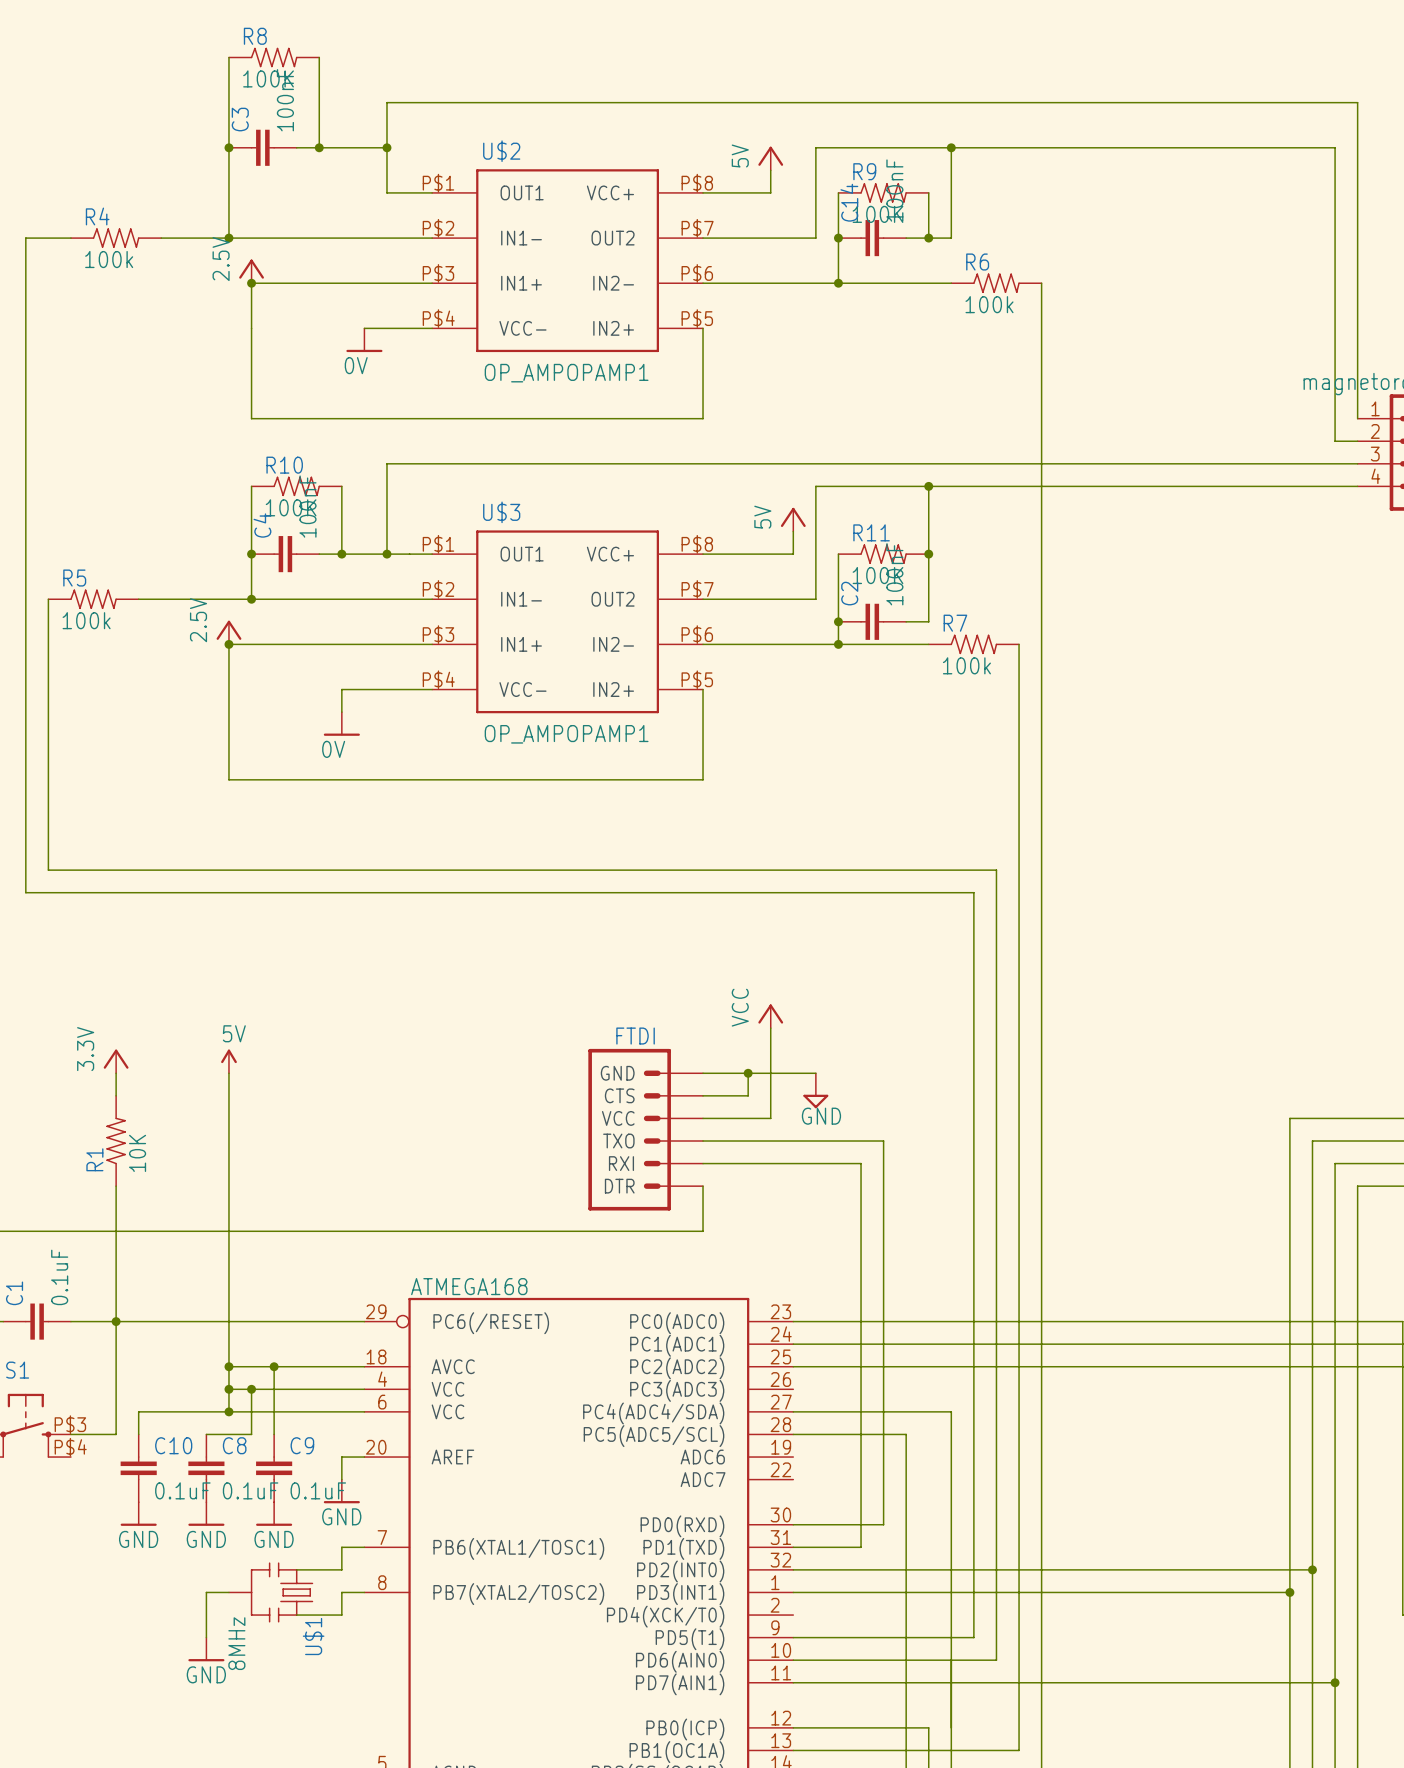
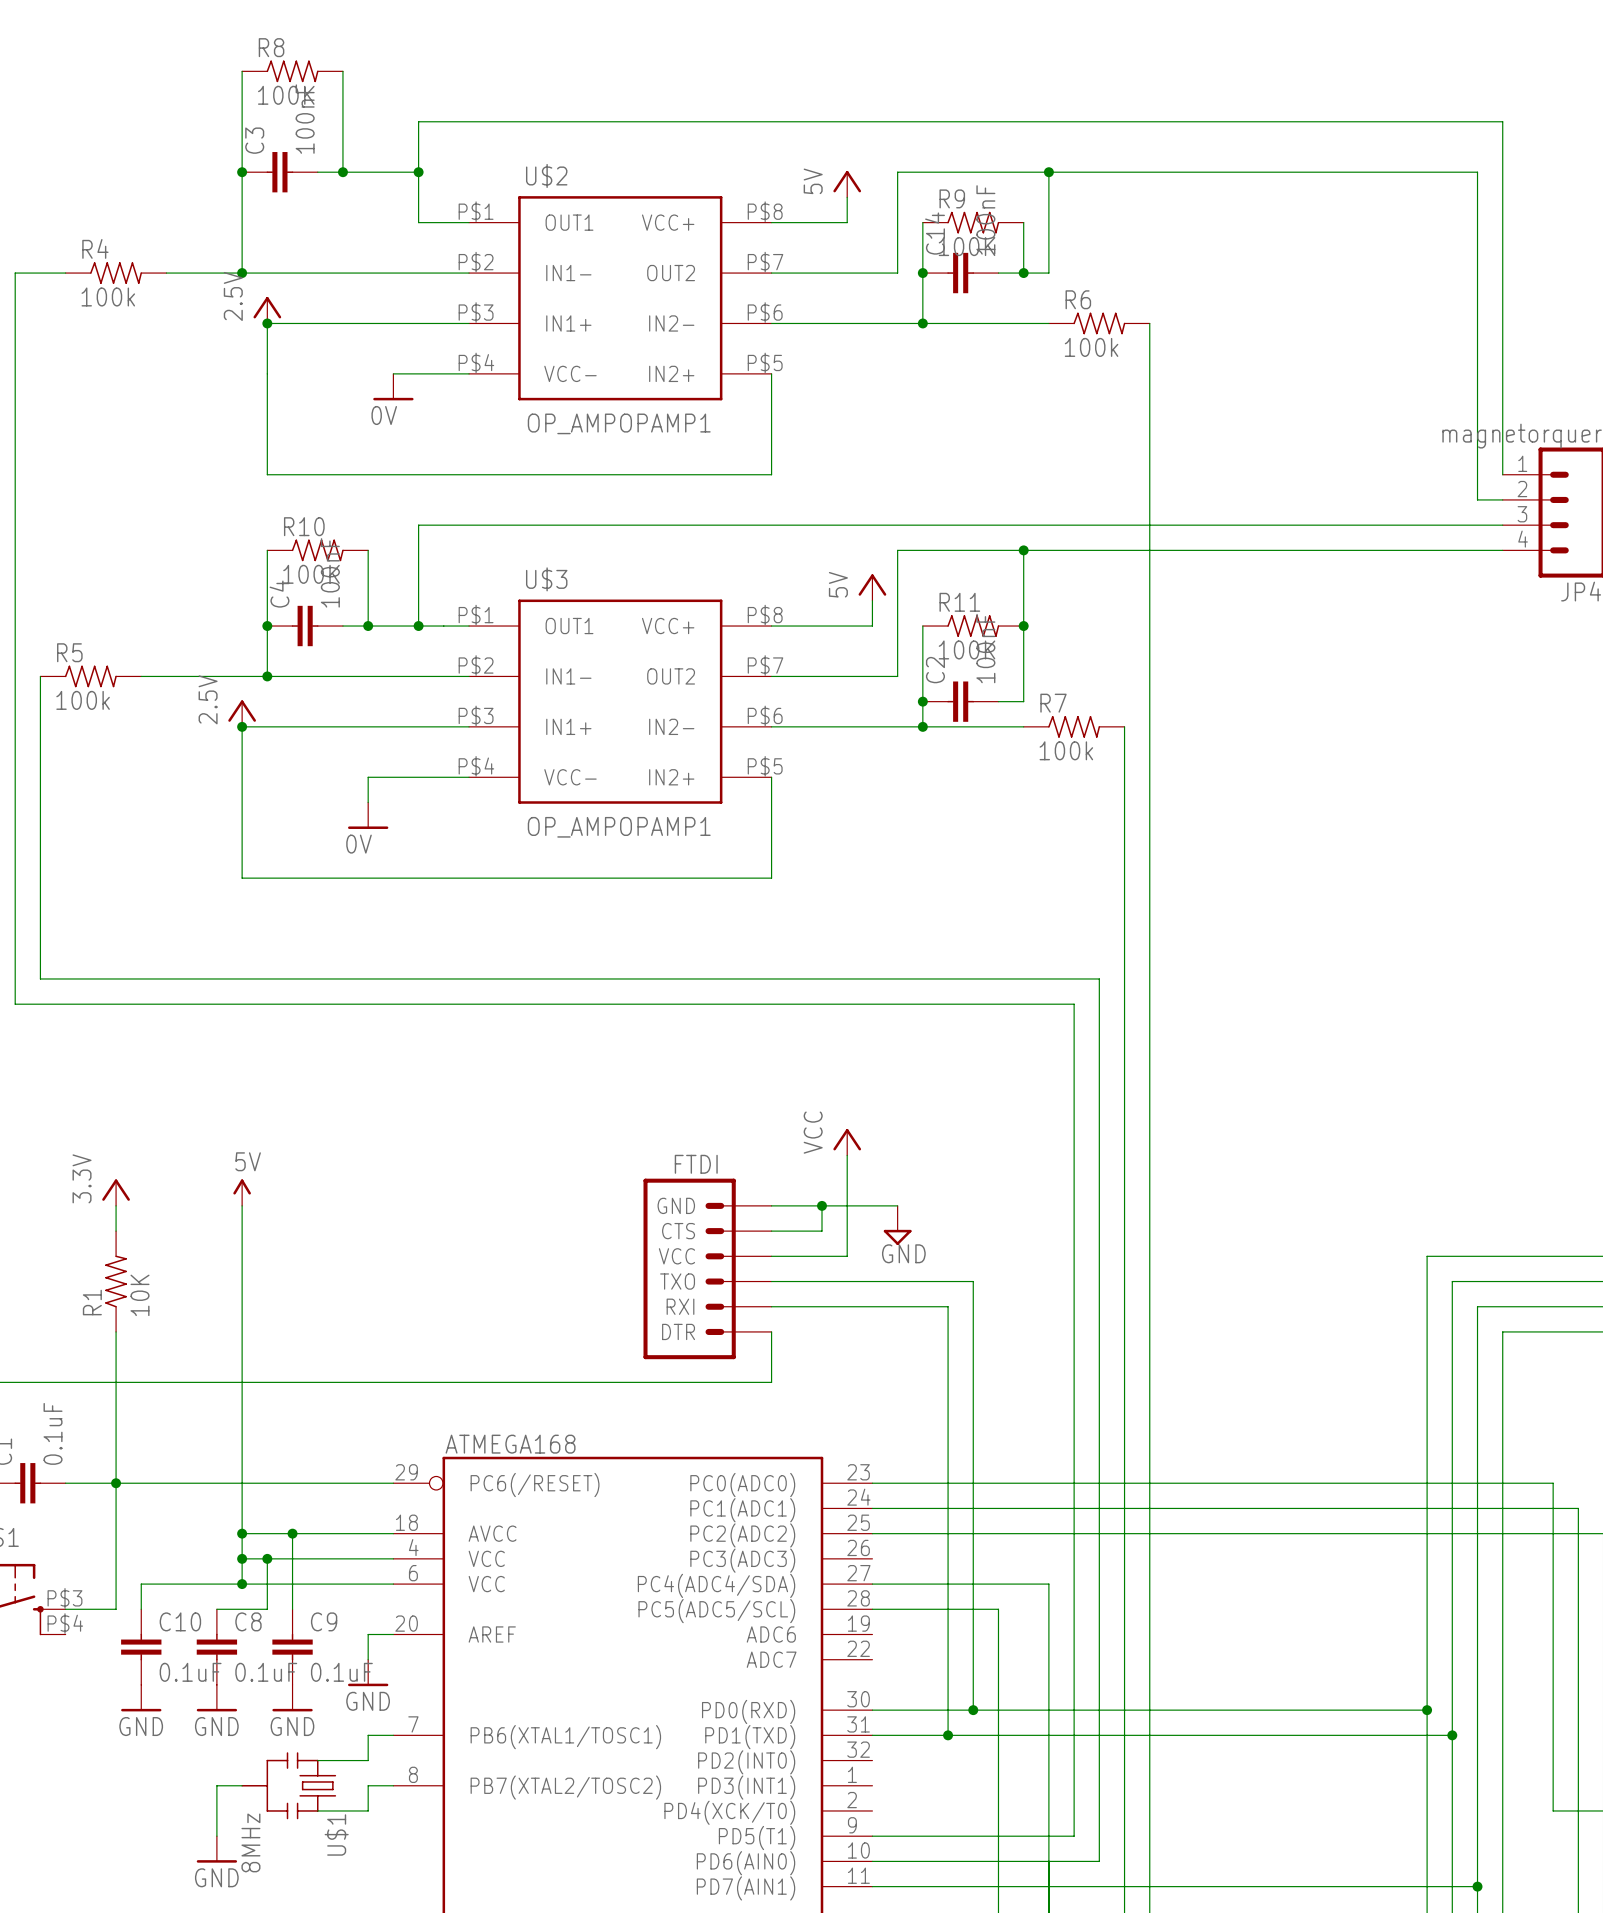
wire: none -> (973, 1710) (1427, 1710)
junction: none -> (973, 1710)
junction: none -> (1427, 1710)
wire: none -> (948, 1735) (1452, 1735)
junction: none -> (948, 1735)
wire: (793, 1569) (1312, 1569) -> none
junction position: (1312, 1569) -> (1452, 1735)
wire: (793, 1592) (1289, 1592) -> none
junction: (1289, 1592) -> none

